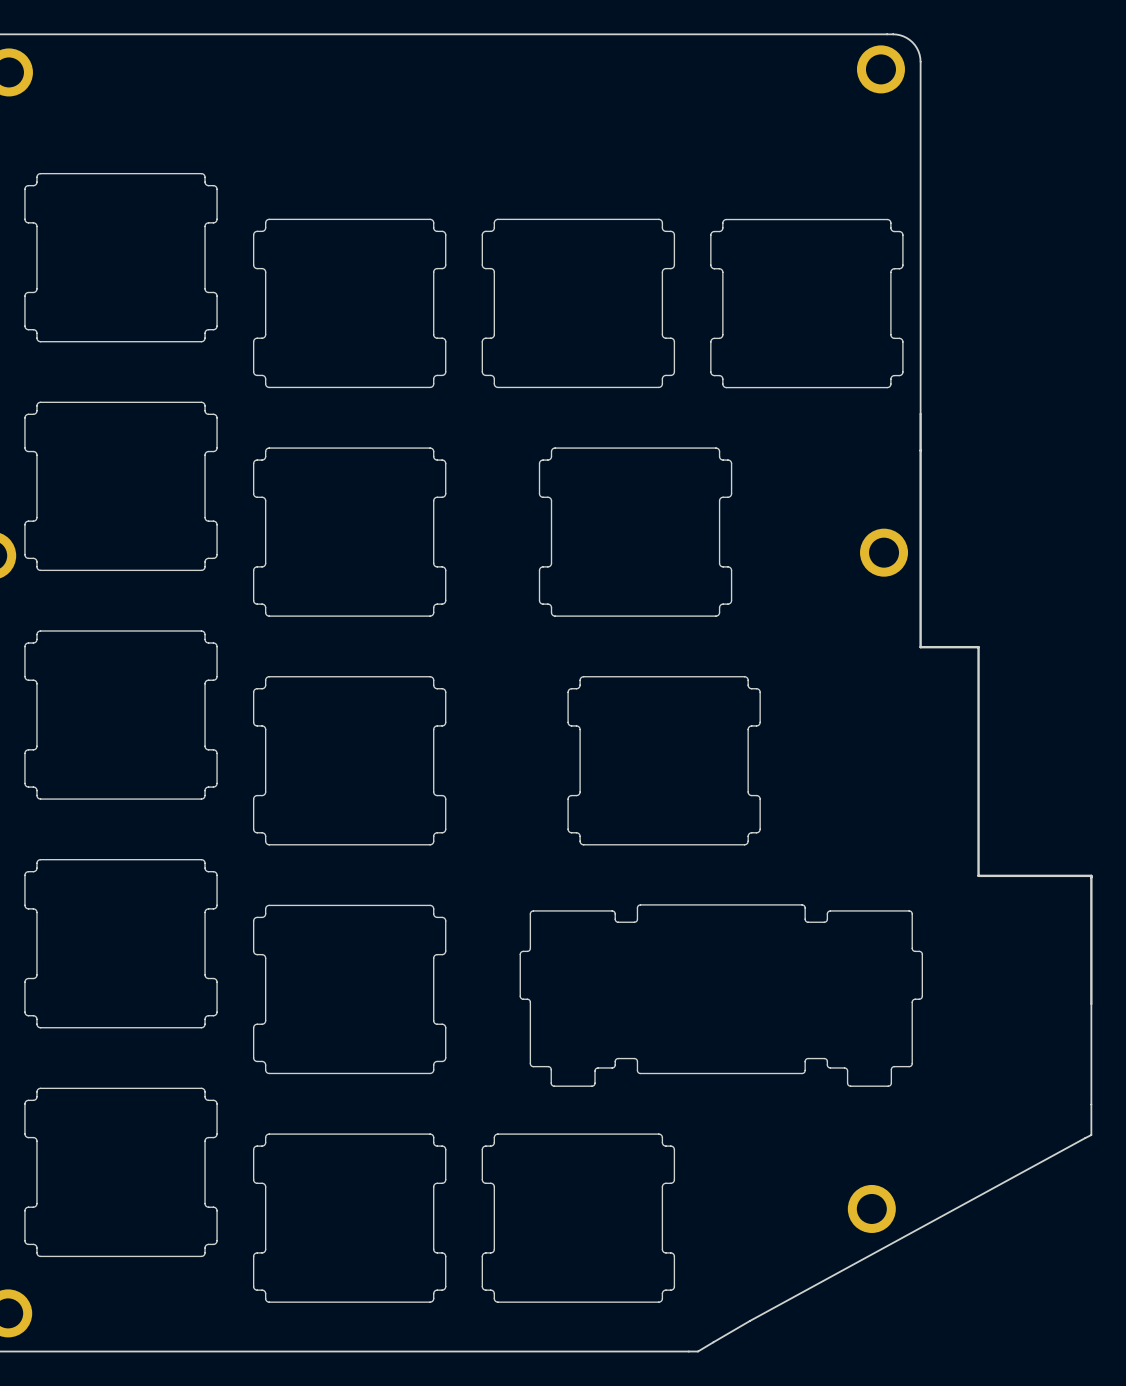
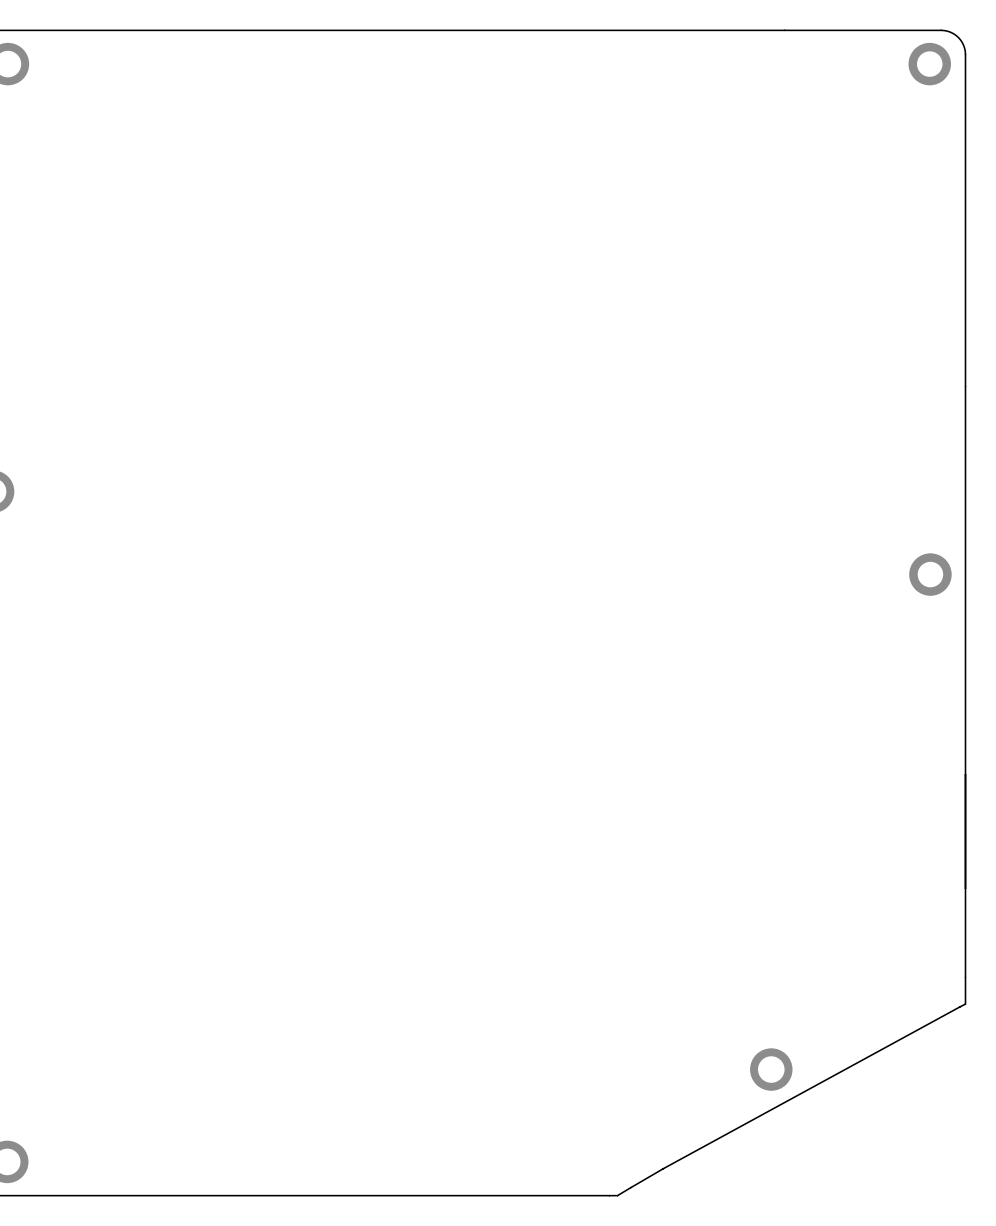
board edge: (893, 34) (903, 36) (912, 42) (918, 51) (920, 61) (920, 647) (978, 647) (978, 875) (1091, 875) -> (790, 30) (944, 30) (958, 37) (964, 48) (965, 774)
part: (880, 69) -> none
part: none -> (929, 64)
drawing: [24, 173, 218, 343] -> none
drawing: [253, 218, 447, 389] -> none
drawing: [481, 218, 675, 389] -> none
drawing: [710, 218, 904, 389] -> none
drawing: [24, 401, 218, 571] -> none
drawing: [253, 447, 447, 617] -> none
drawing: [538, 447, 733, 617] -> none
part: (884, 552) -> none
drawing: [24, 630, 218, 800] -> none
part: none -> (930, 574)
drawing: [253, 676, 447, 846] -> none
drawing: [567, 676, 761, 846] -> none
drawing: [24, 859, 218, 1029] -> none
drawing: [253, 904, 447, 1075] -> none
drawing: [519, 904, 923, 1087] -> none
drawing: [24, 1087, 218, 1258] -> none
drawing: [253, 1133, 447, 1303] -> none
drawing: [481, 1133, 675, 1303] -> none

